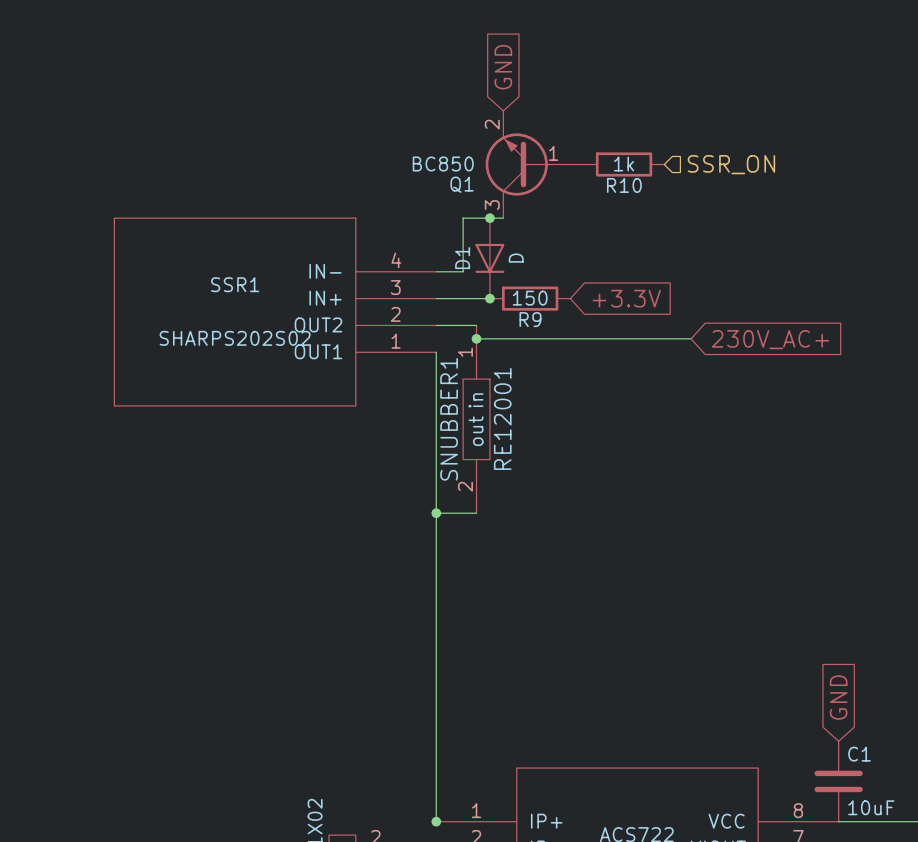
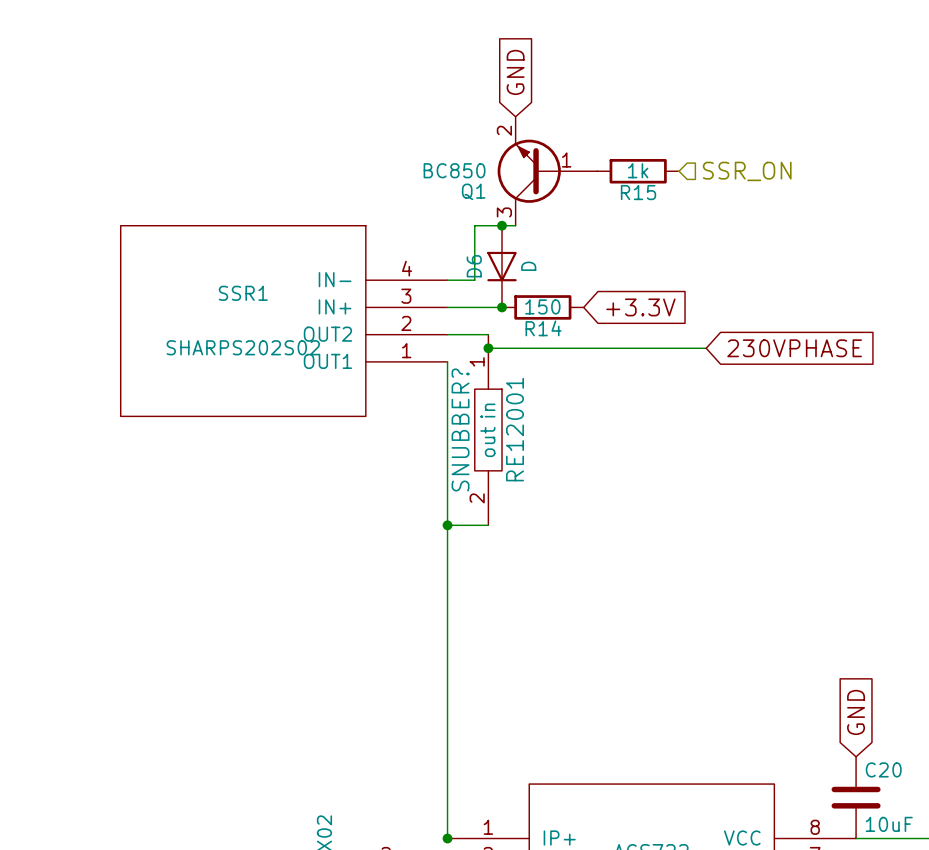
R10 name: R10 (624, 185) -> R15 (638, 192)
D1 name: D1 (462, 258) -> D6 (474, 266)
R9 name: R9 (530, 319) -> R14 (543, 328)
global label: 230V_AC+ (770, 339) -> 230VPHASE (794, 348)
SNUBBER1 name: SNUBBER1 (449, 419) -> SNUBBER? (460, 429)
C1 name: C1 (859, 754) -> C20 (883, 769)

